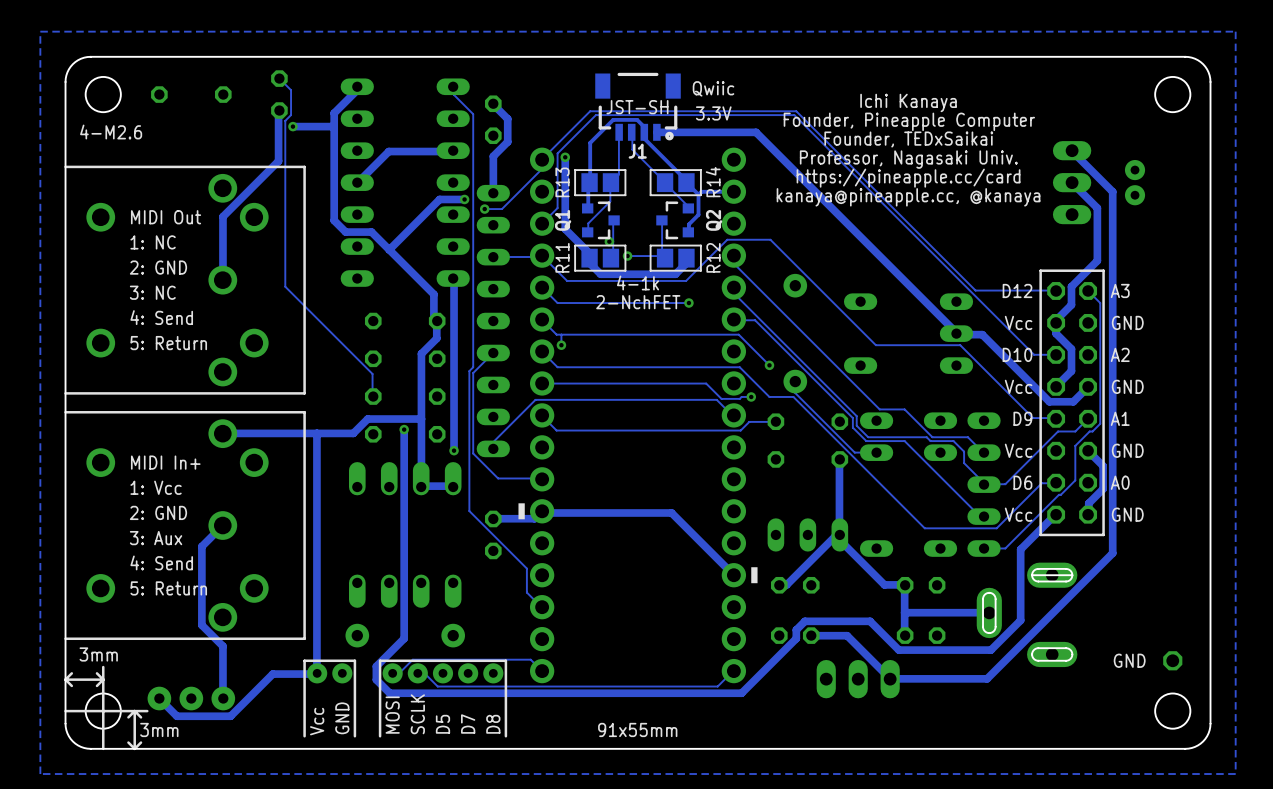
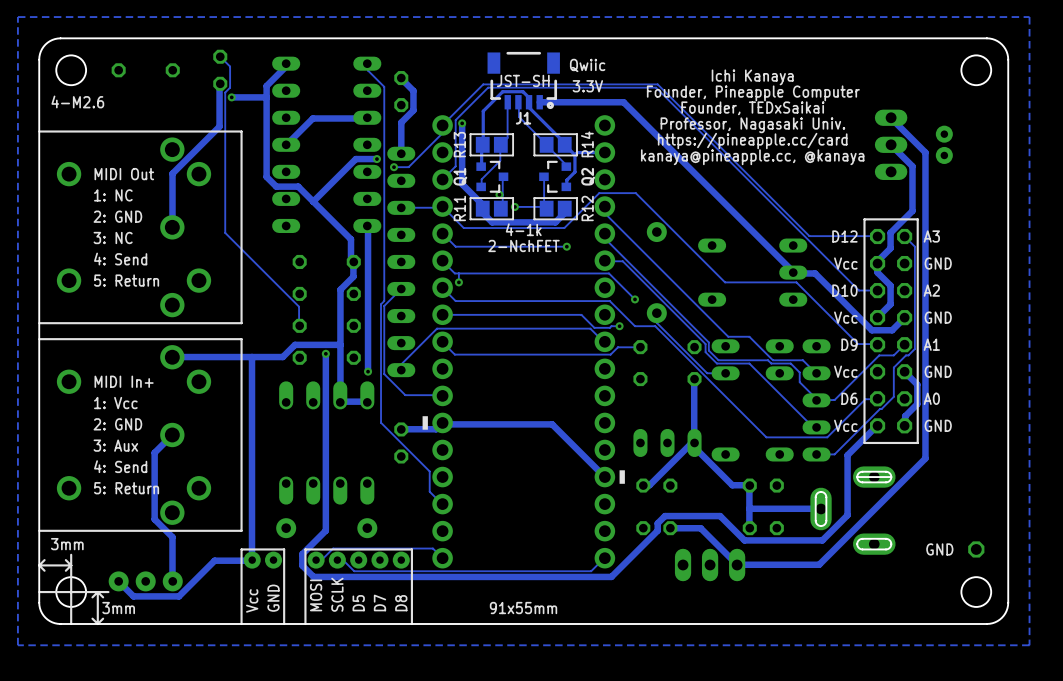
line: none -> (241, 613) (241, 623)
line: none -> (284, 613) (284, 623)
line: none -> (305, 613) (305, 623)
line: none -> (411, 613) (411, 623)

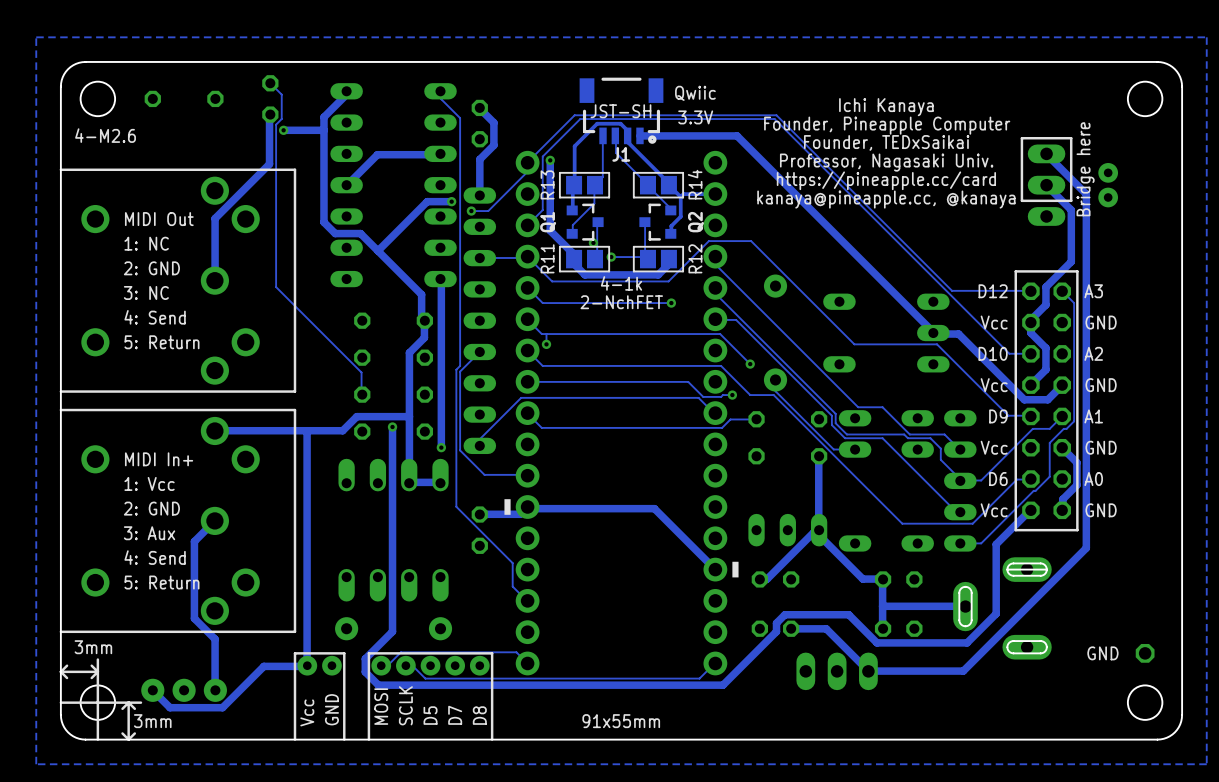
line: none -> (1071, 138) (1021, 138) (1021, 200) (1071, 200) (1071, 138)
text: none -> Bridge here (1085, 169)

